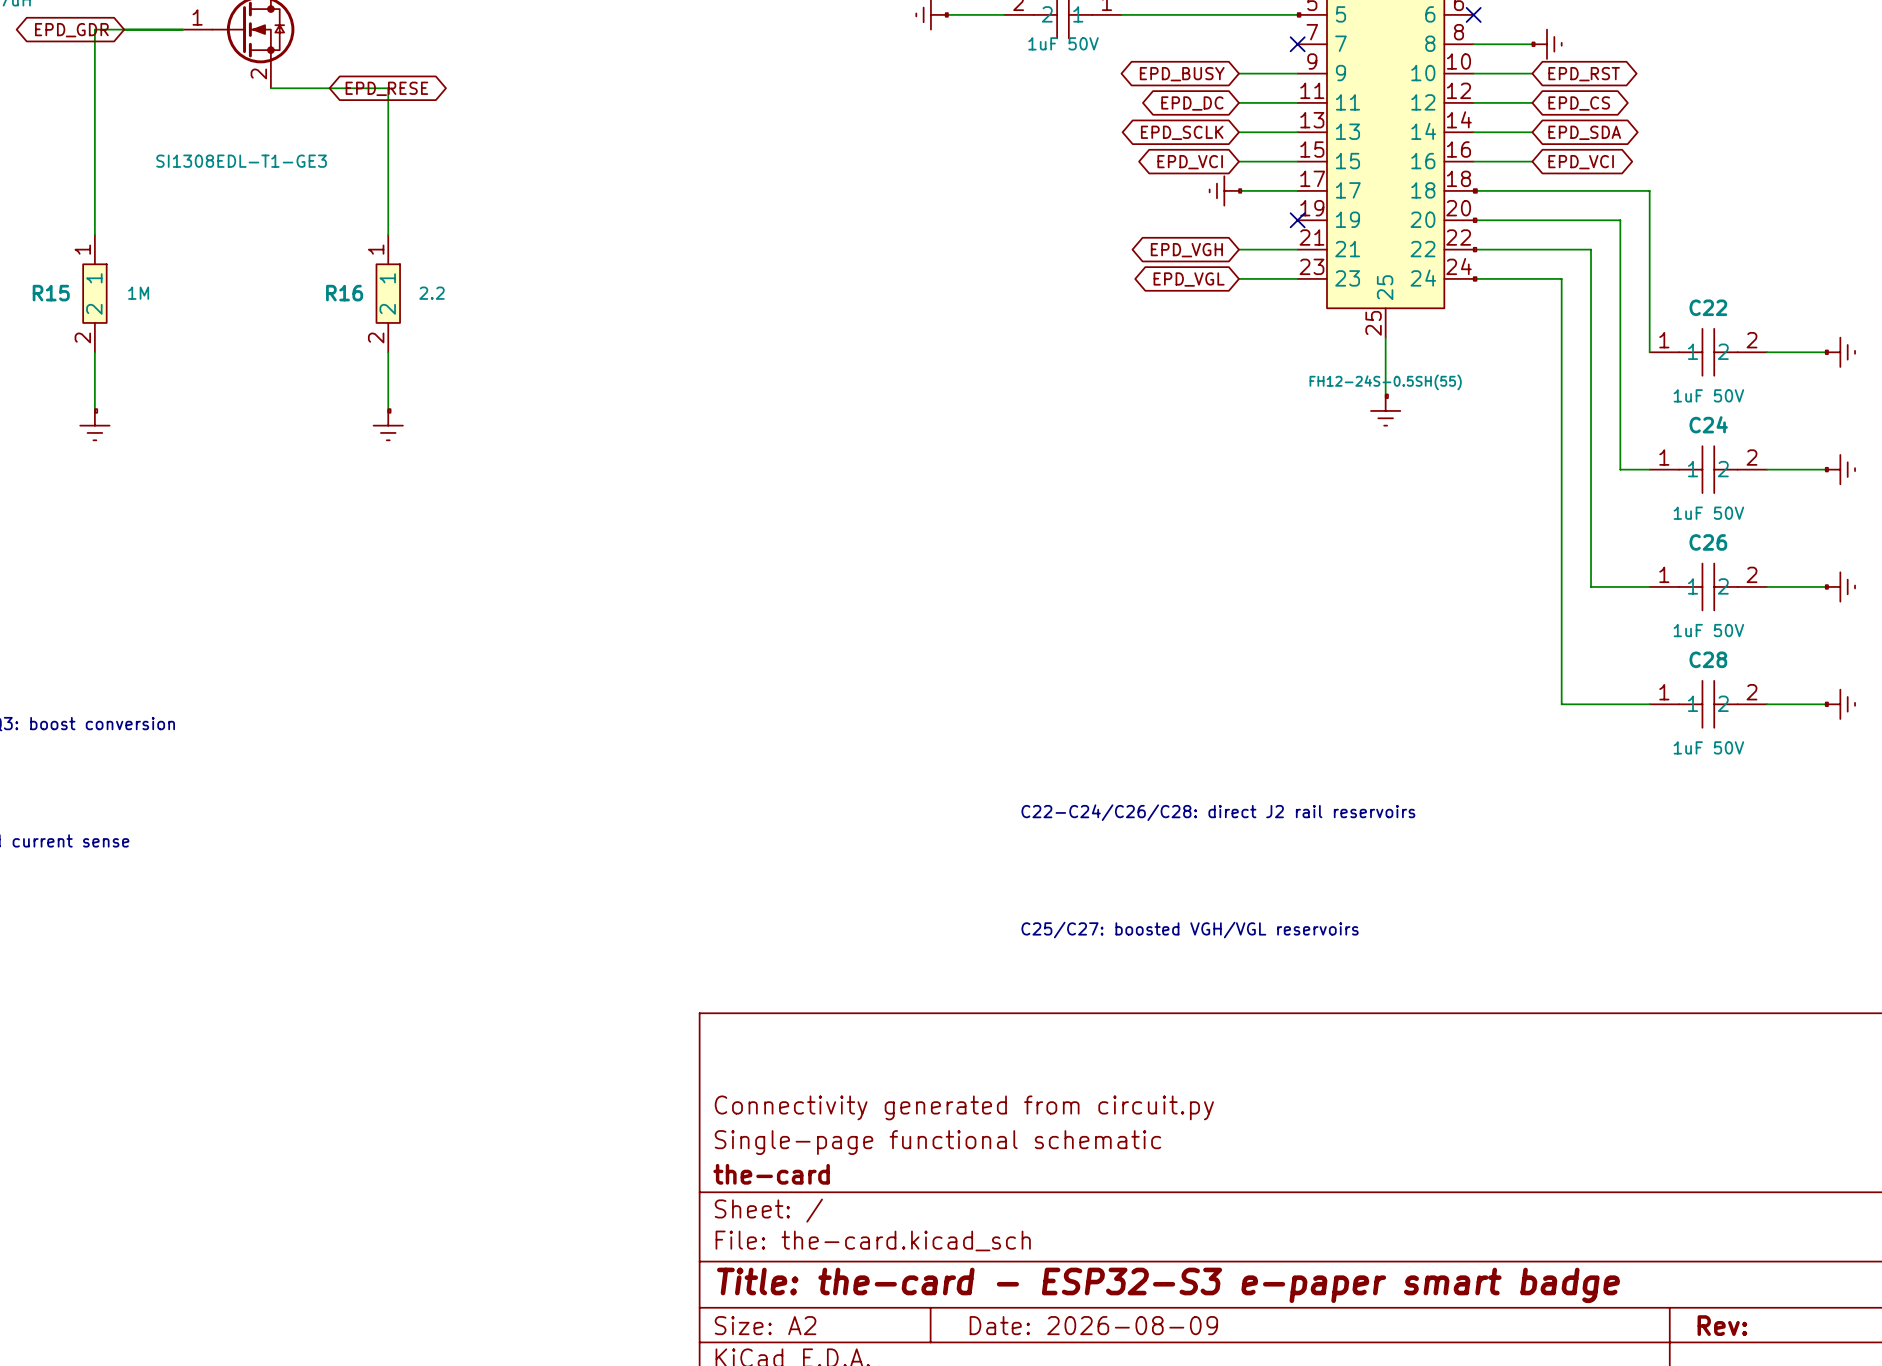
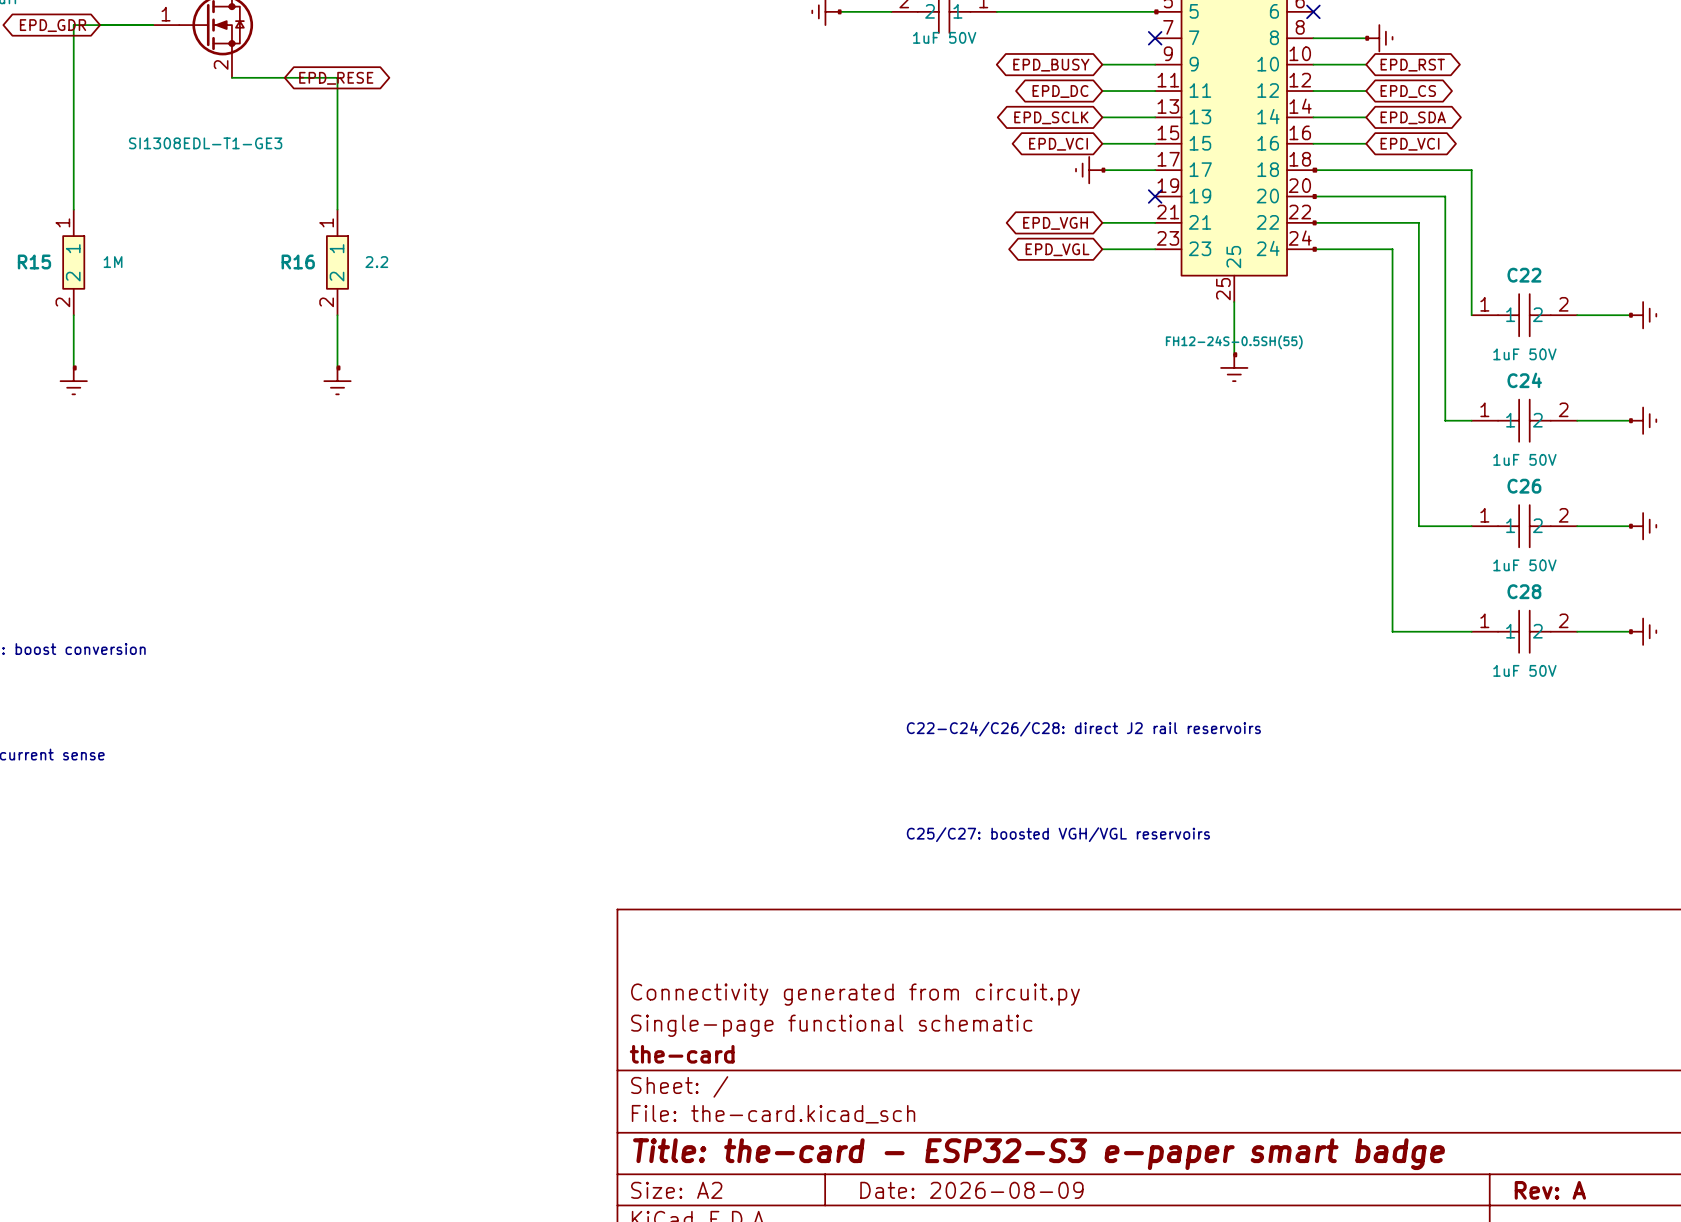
title block: Rev: (1722, 1325) -> Rev: A (1550, 1190)

